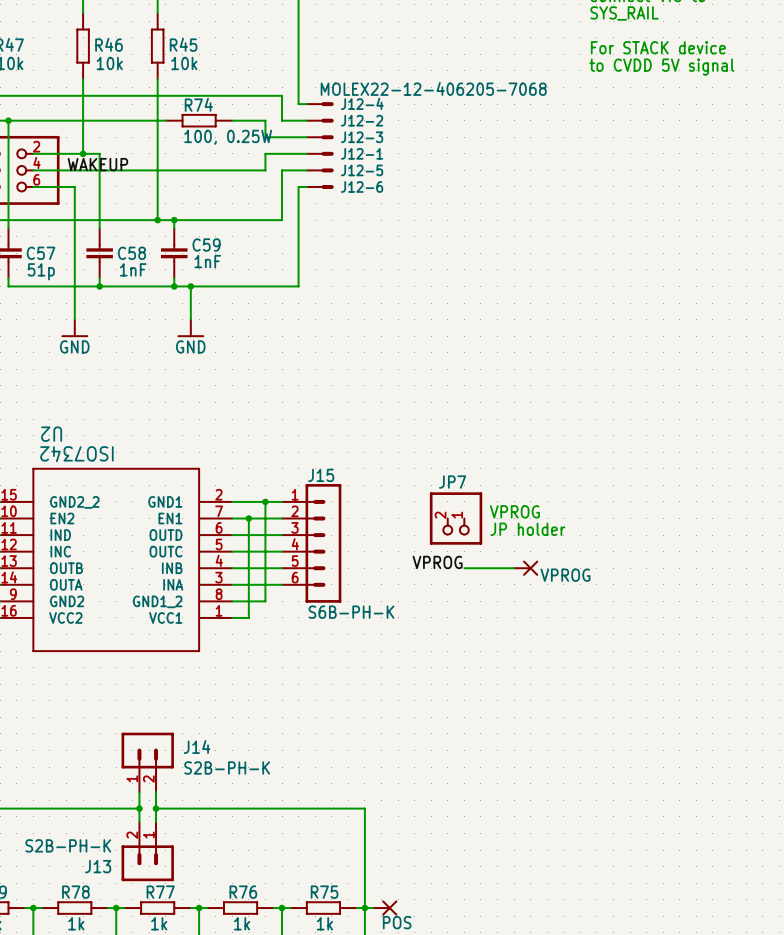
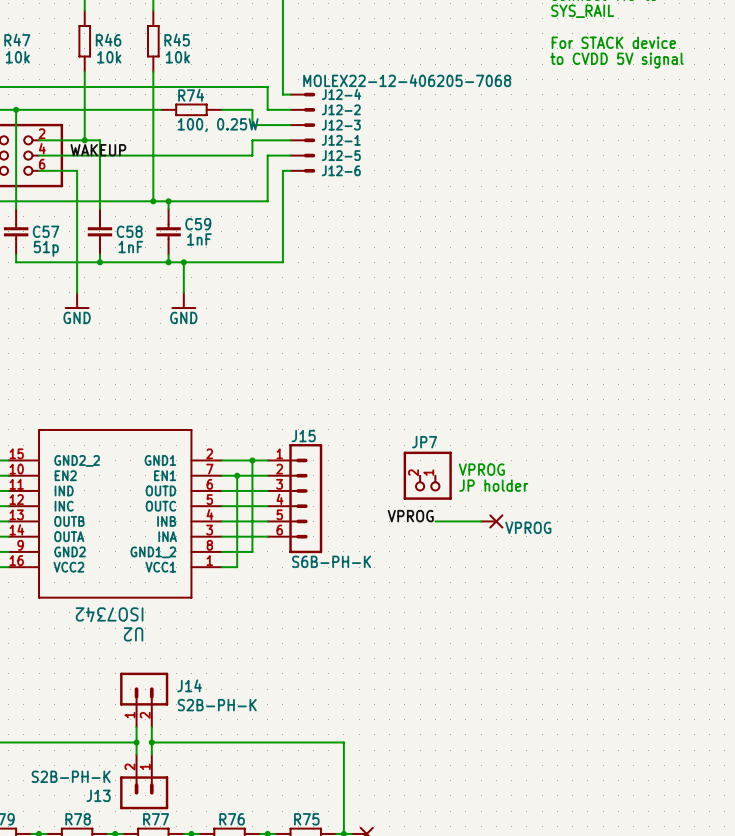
U2 name position: U2 (51, 434) -> U2 (133, 634)
U2 value position: ISO7342 (76, 454) -> ISO7342 (109, 614)

